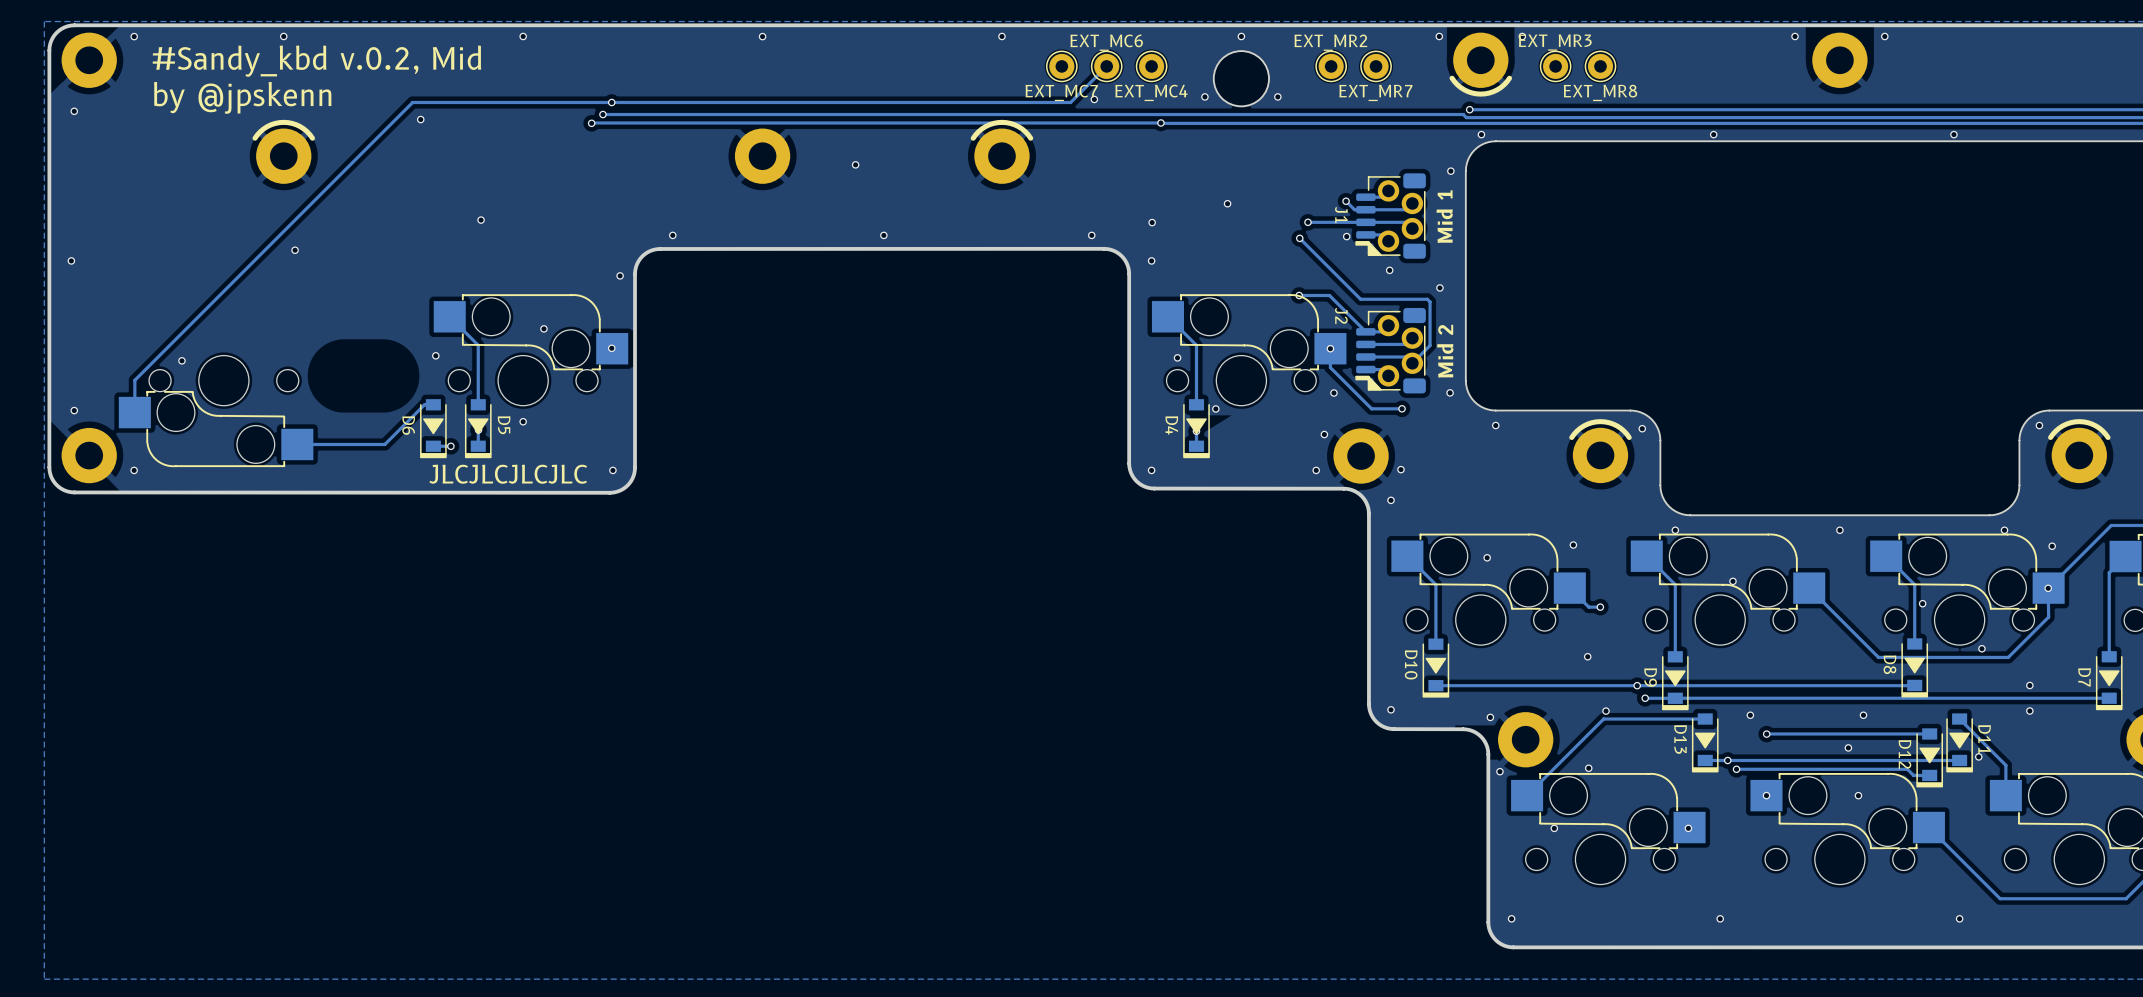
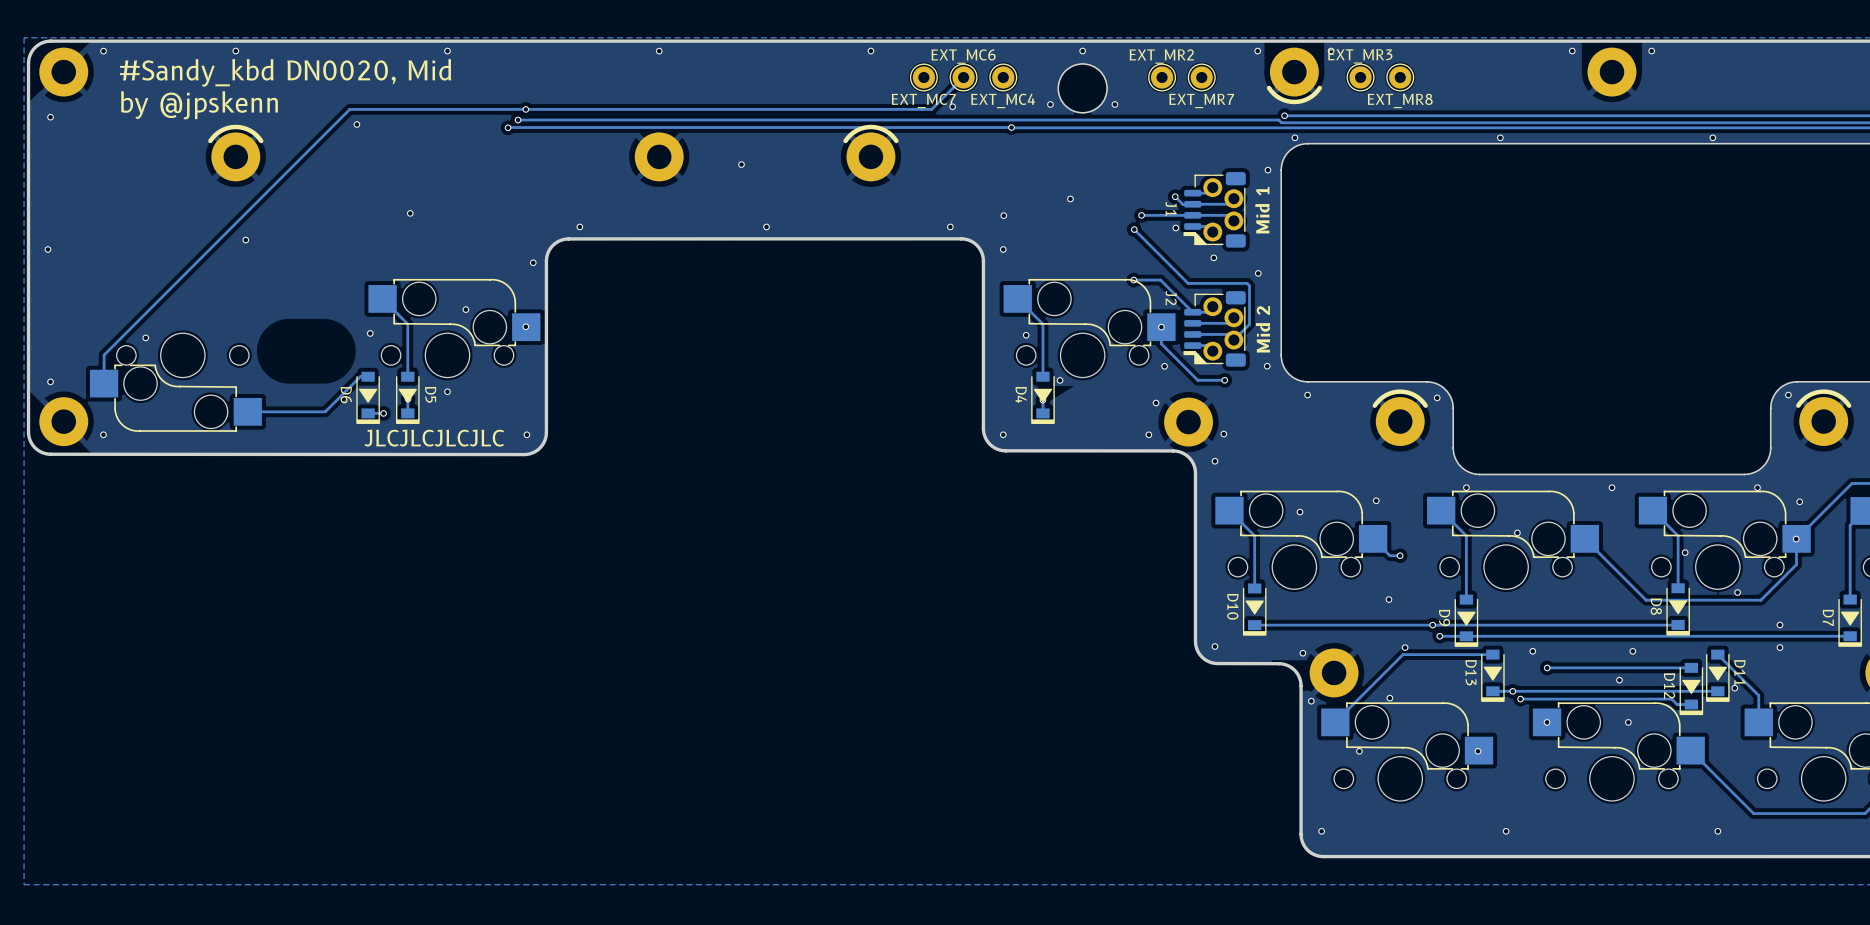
text: #Sandy_kbd v.0.2, Mid (316, 61) -> #Sandy_kbd DN0020, Mid (285, 72)

